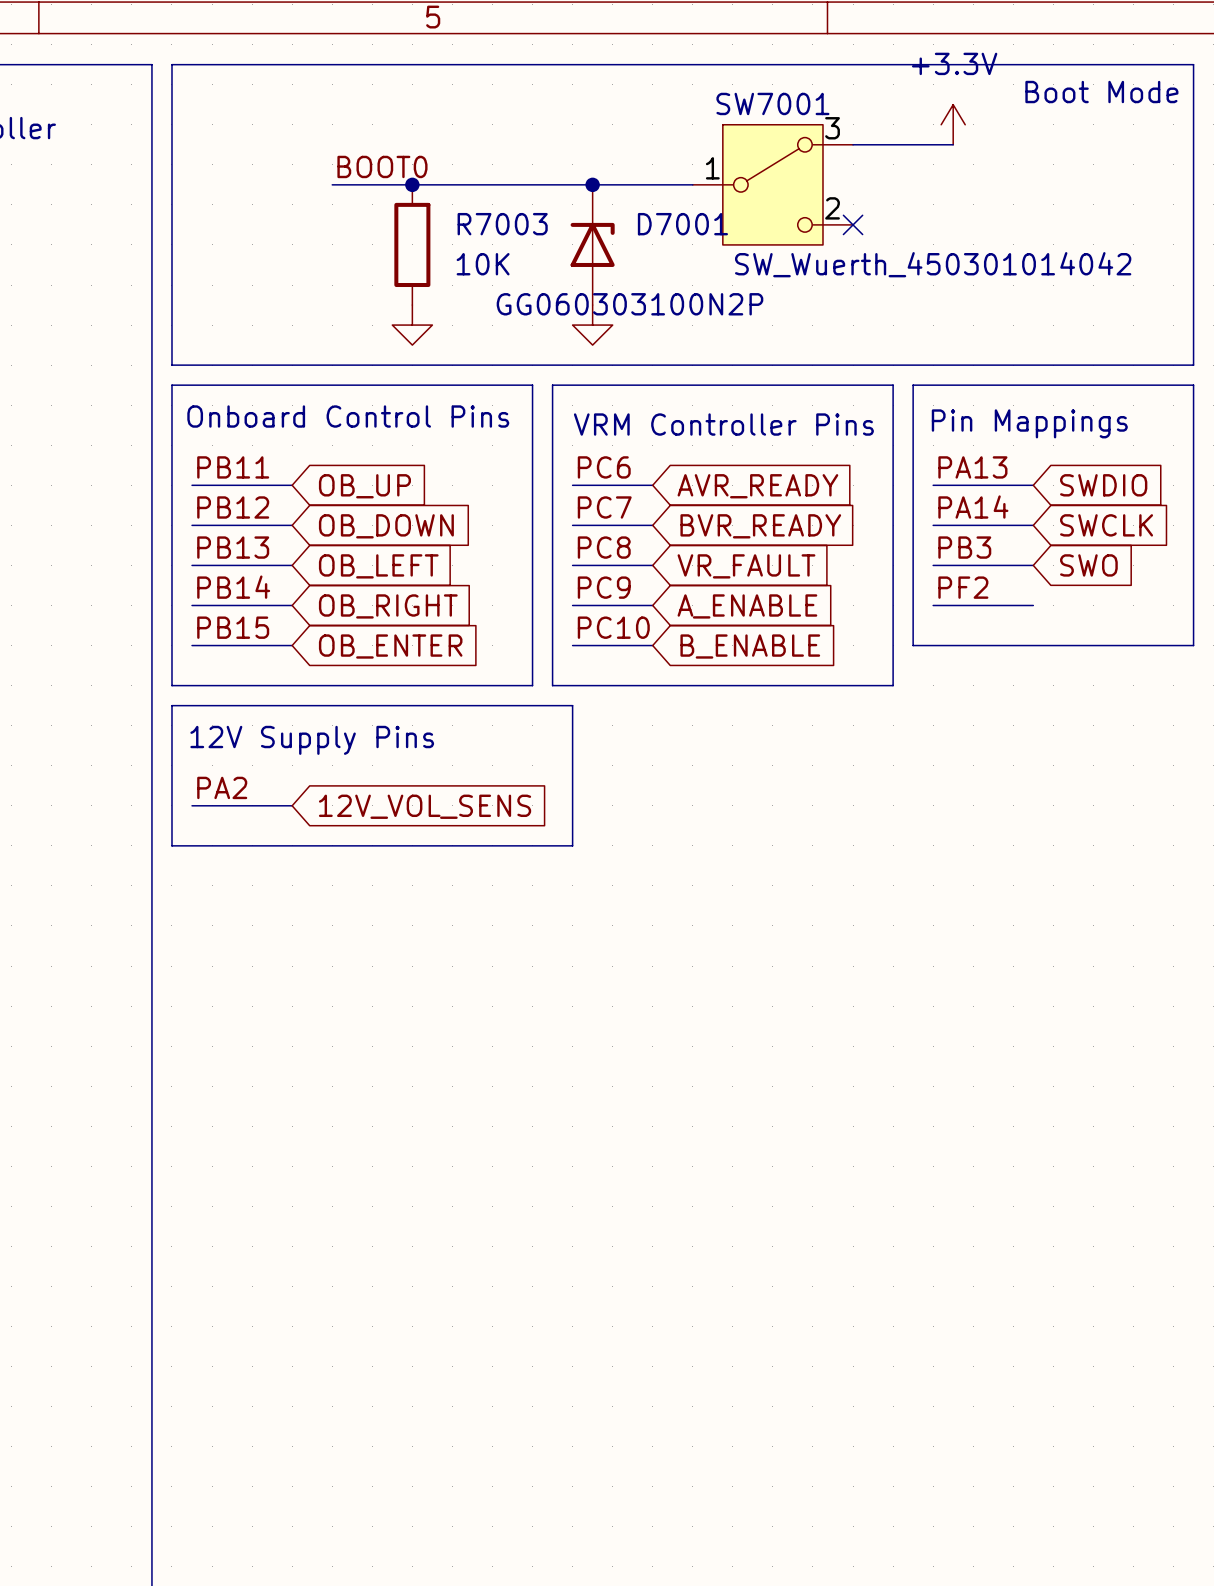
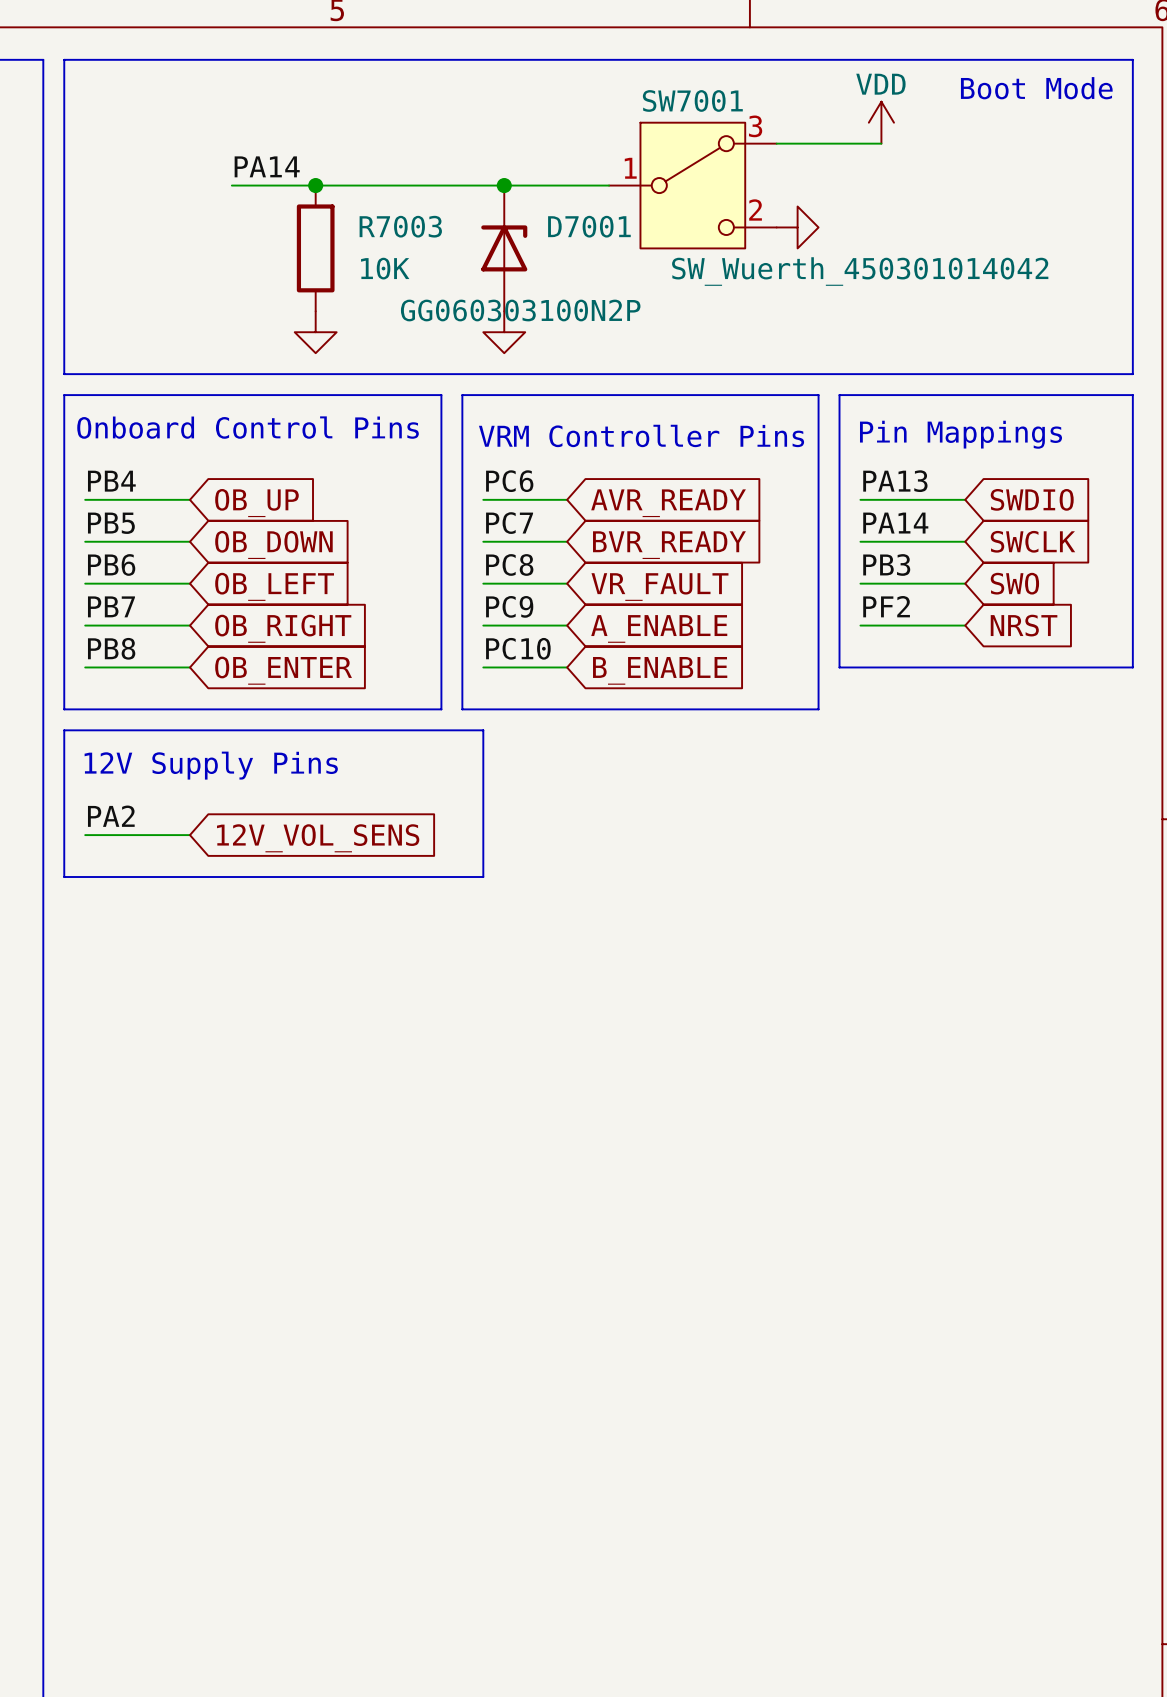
power symbol: +3.3V (953, 124) -> VDD (881, 122)
label: BOOT0 (382, 166) -> PA14 (267, 166)
no-connect mark: (853, 224) -> none
power symbol: none -> (797, 227)
label: PB11 (233, 467) -> PB4 (111, 481)
label: PB12 (233, 507) -> PB5 (111, 523)
label: PB13 (233, 547) -> PB6 (111, 564)
label: PB14 (233, 587) -> PB7 (111, 606)
global label: none -> NRST (1024, 625)
label: PB15 (233, 627) -> PB8 (111, 648)

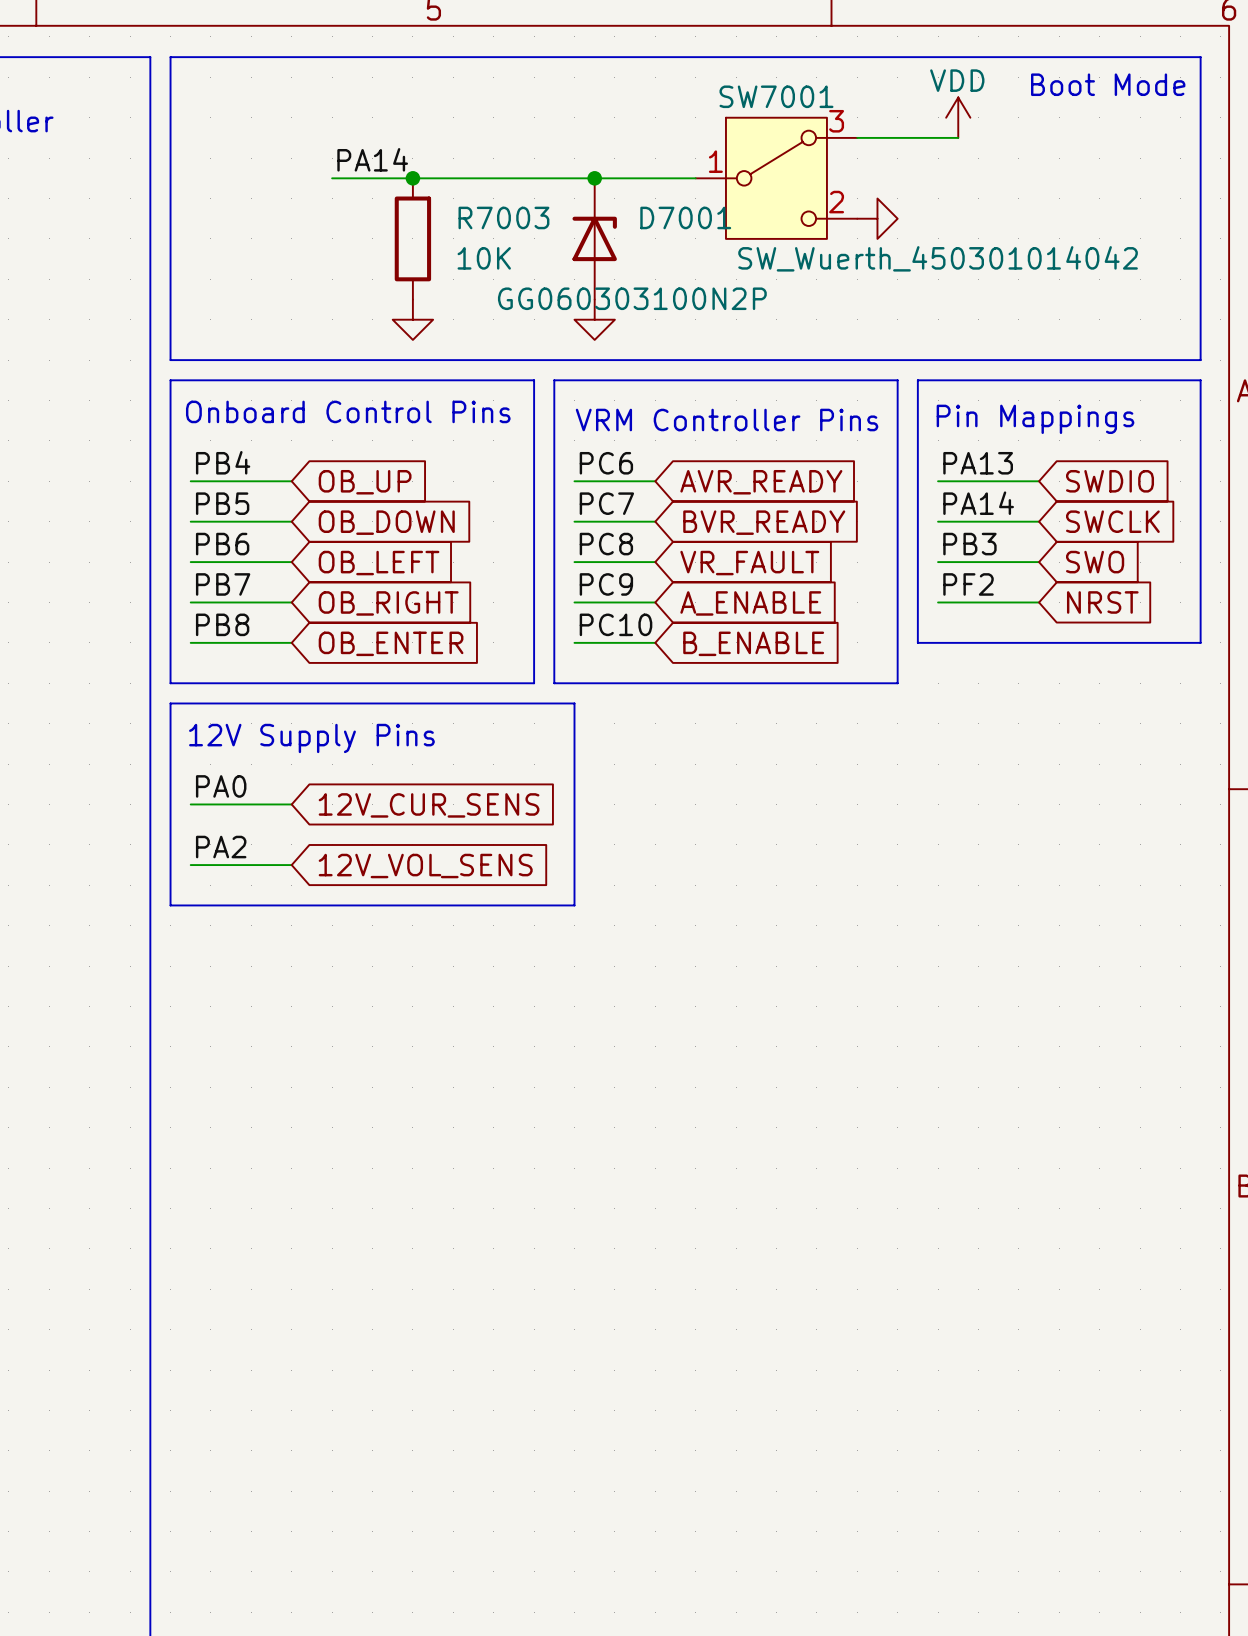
label: PA2 (111, 816) -> PA0 (221, 786)
global label: 12V_VOL_SENS (318, 838) -> 12V_CUR_SENS (429, 805)
line: (64, 877) (483, 877) -> (170, 844) (170, 905) (574, 905) (574, 844)
label: none -> PA2 (221, 847)
wire: none -> (190, 865) (291, 865)
global label: none -> 12V_VOL_SENS (425, 866)

